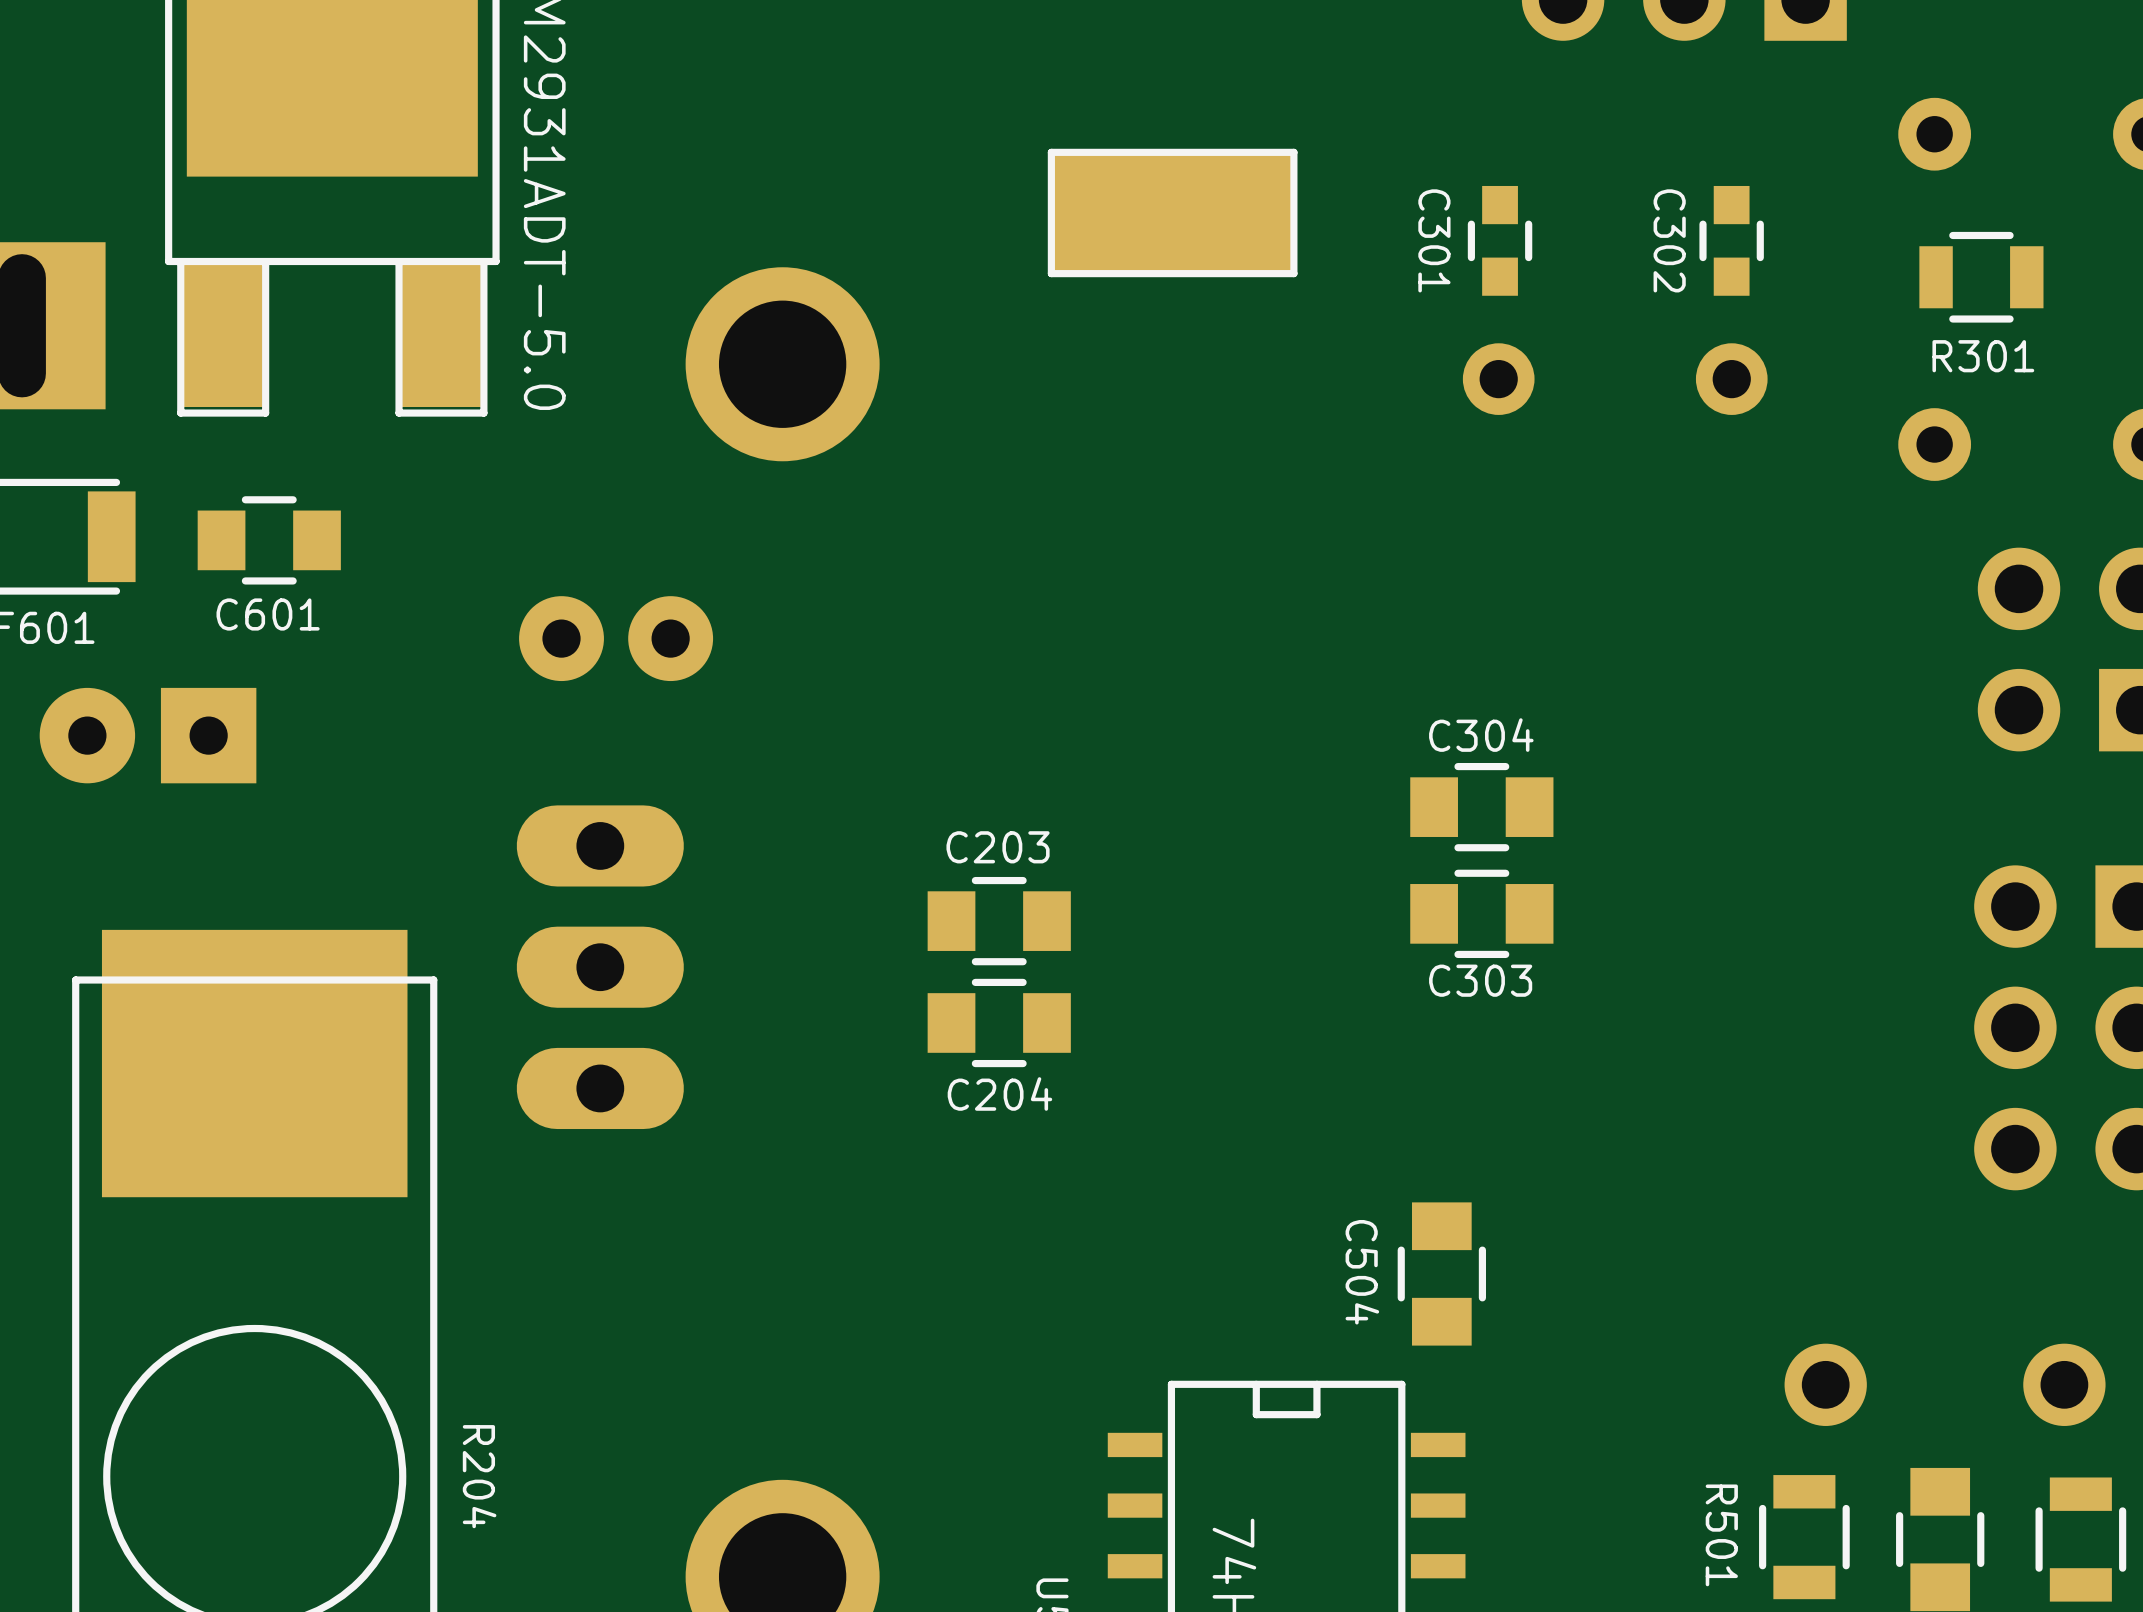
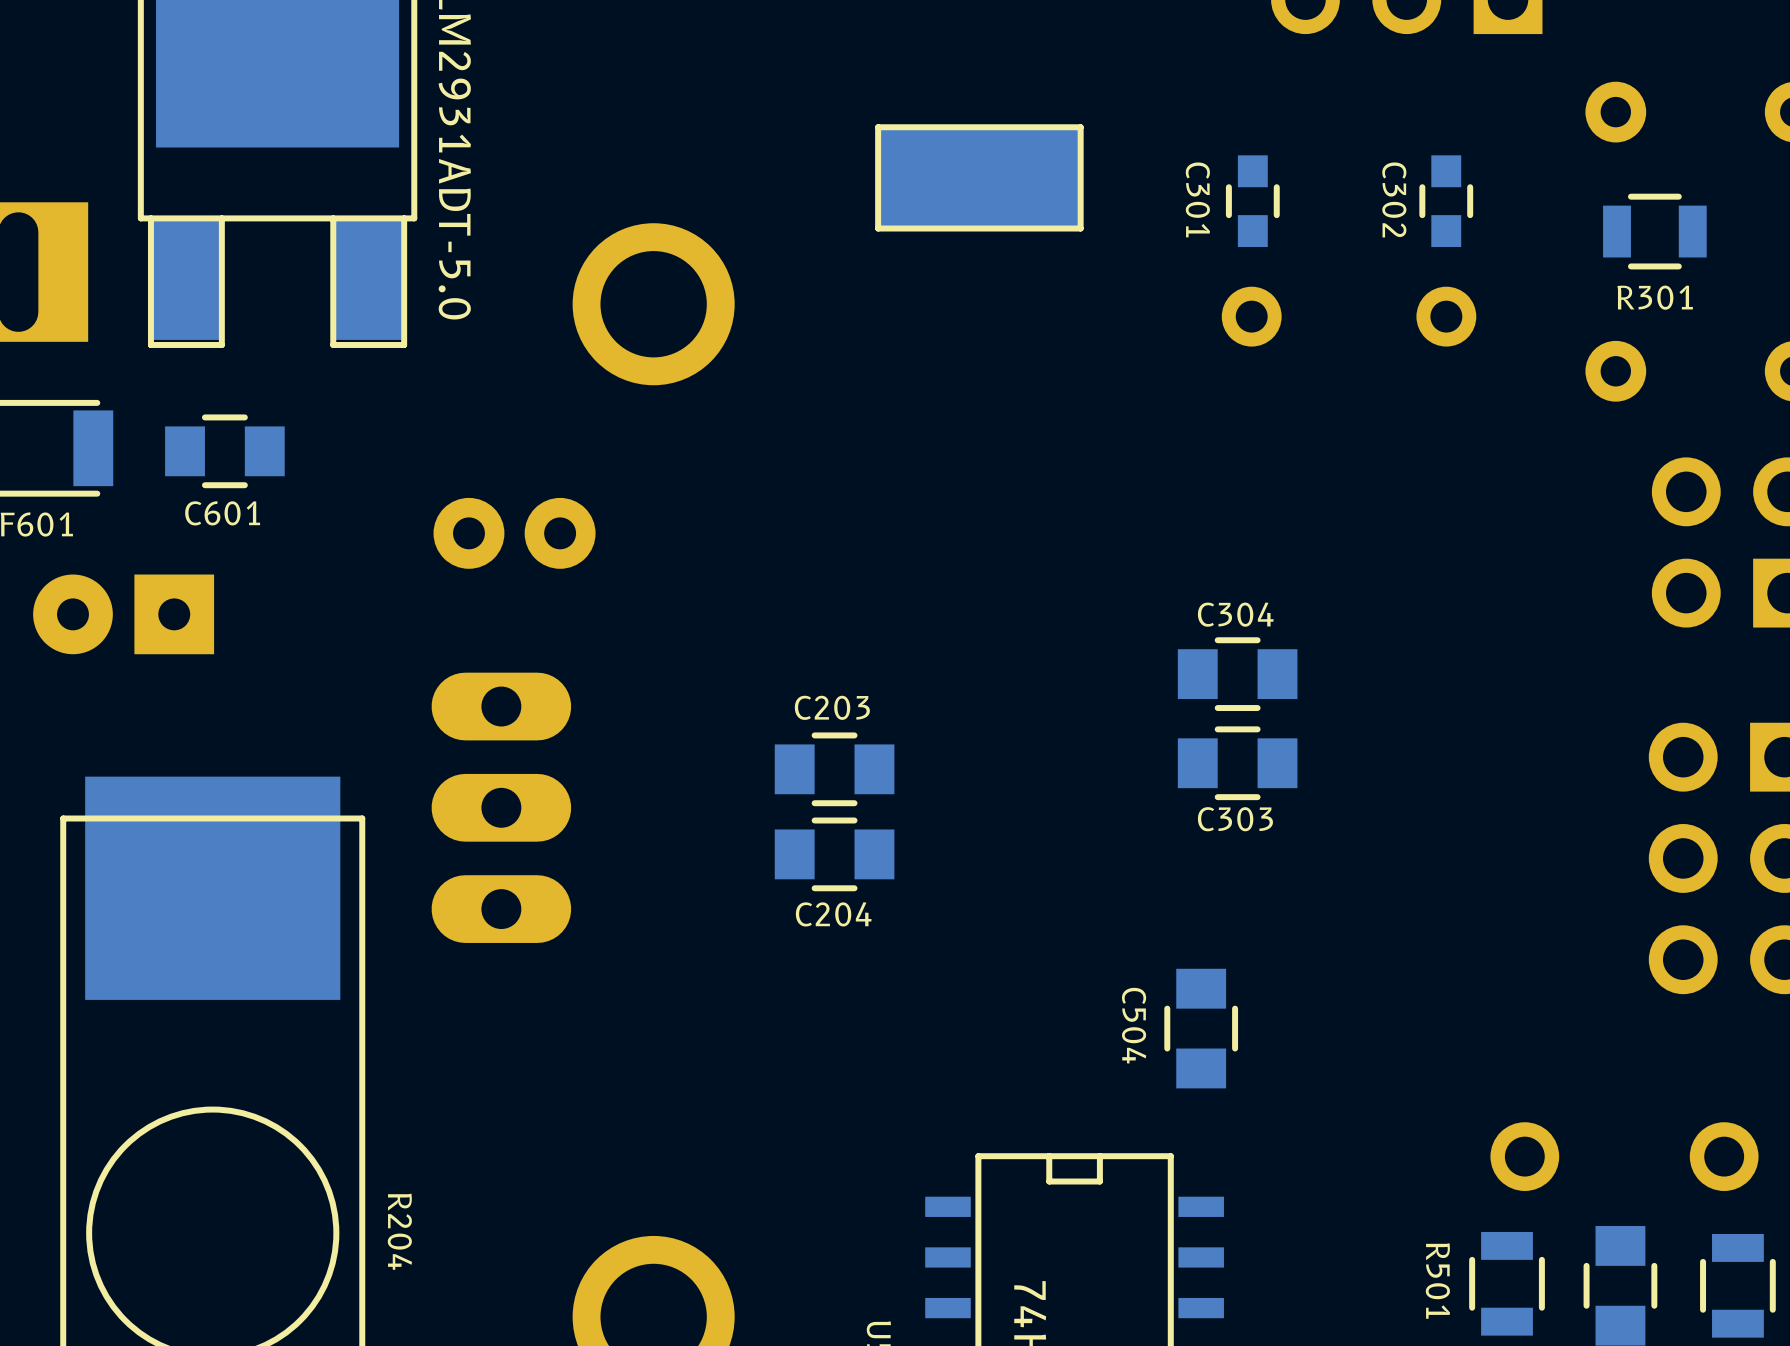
C504 position: (1441, 1273) -> (1201, 1028)

